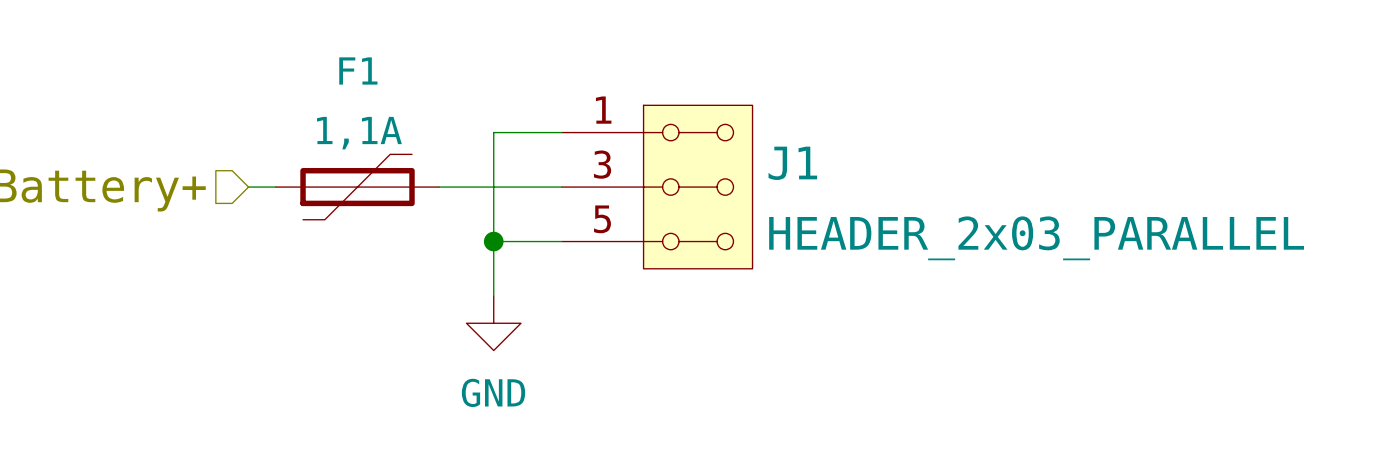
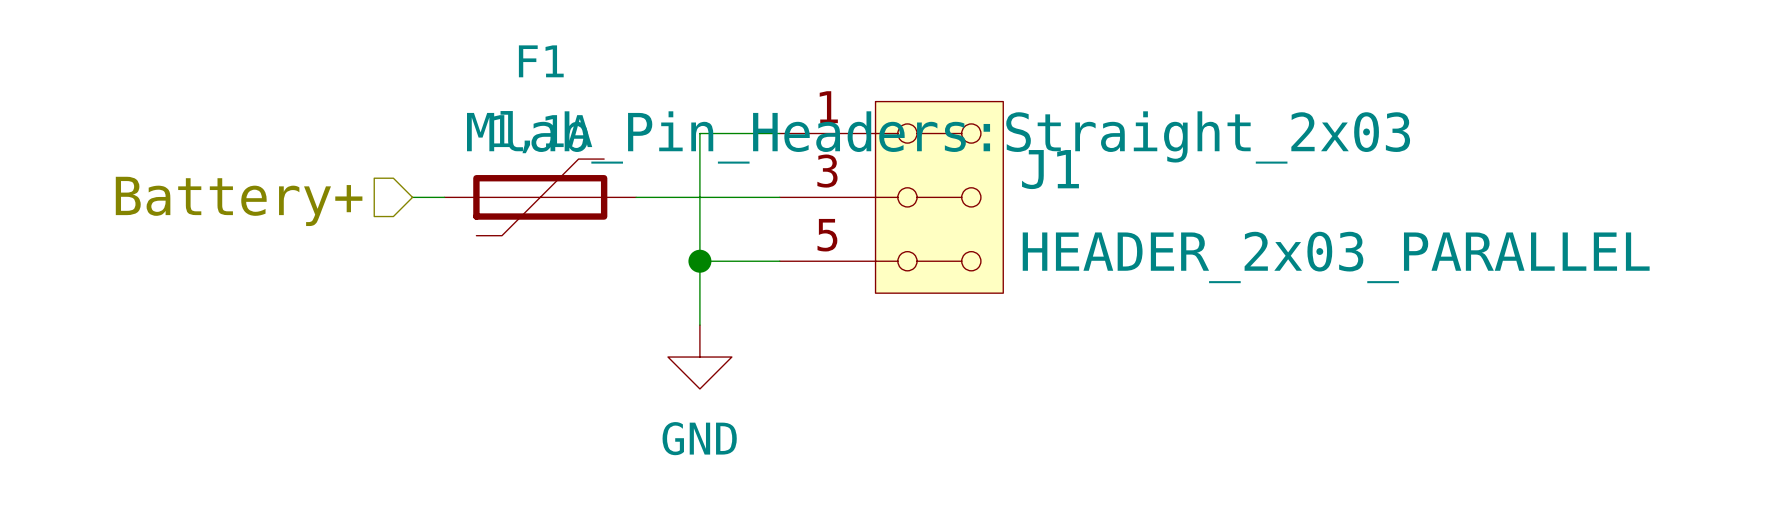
J1 text: none -> Mlab_Pin_Headers:Straight_2x03 (938, 137)

